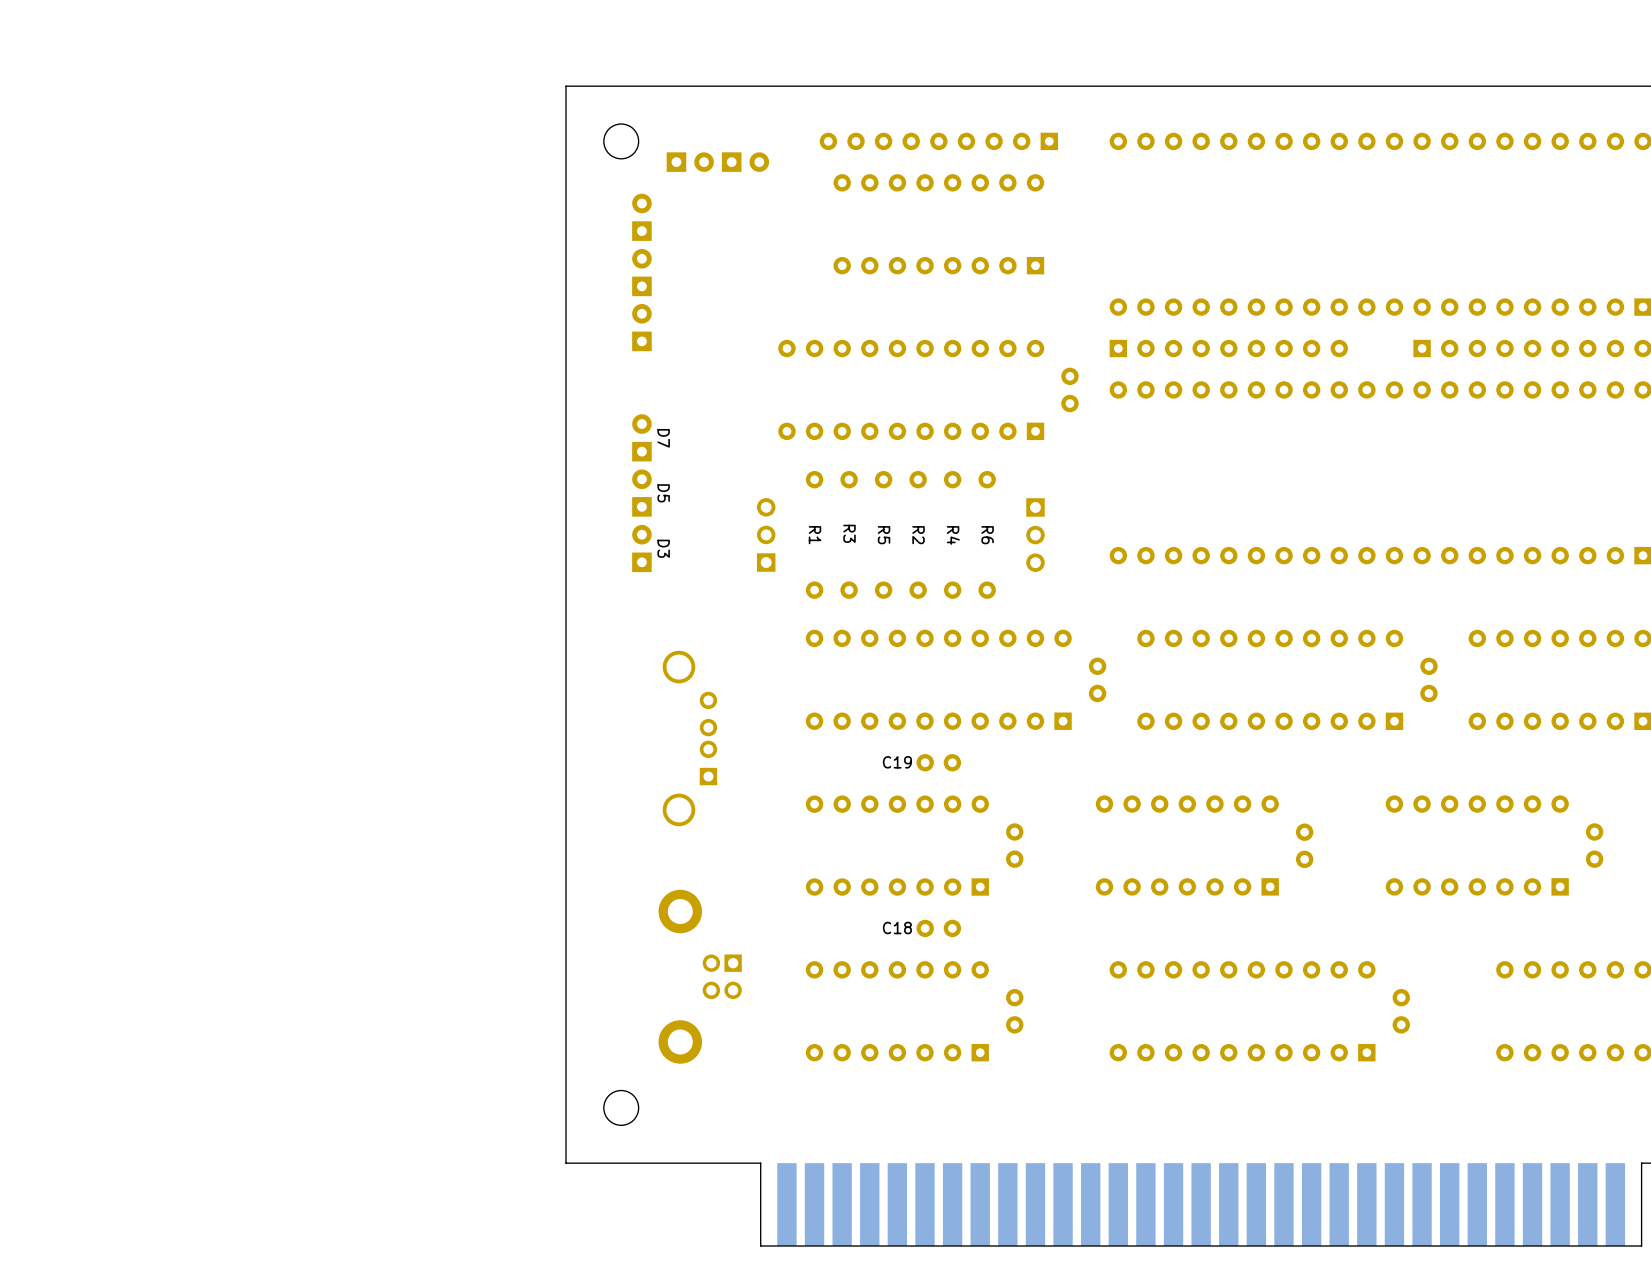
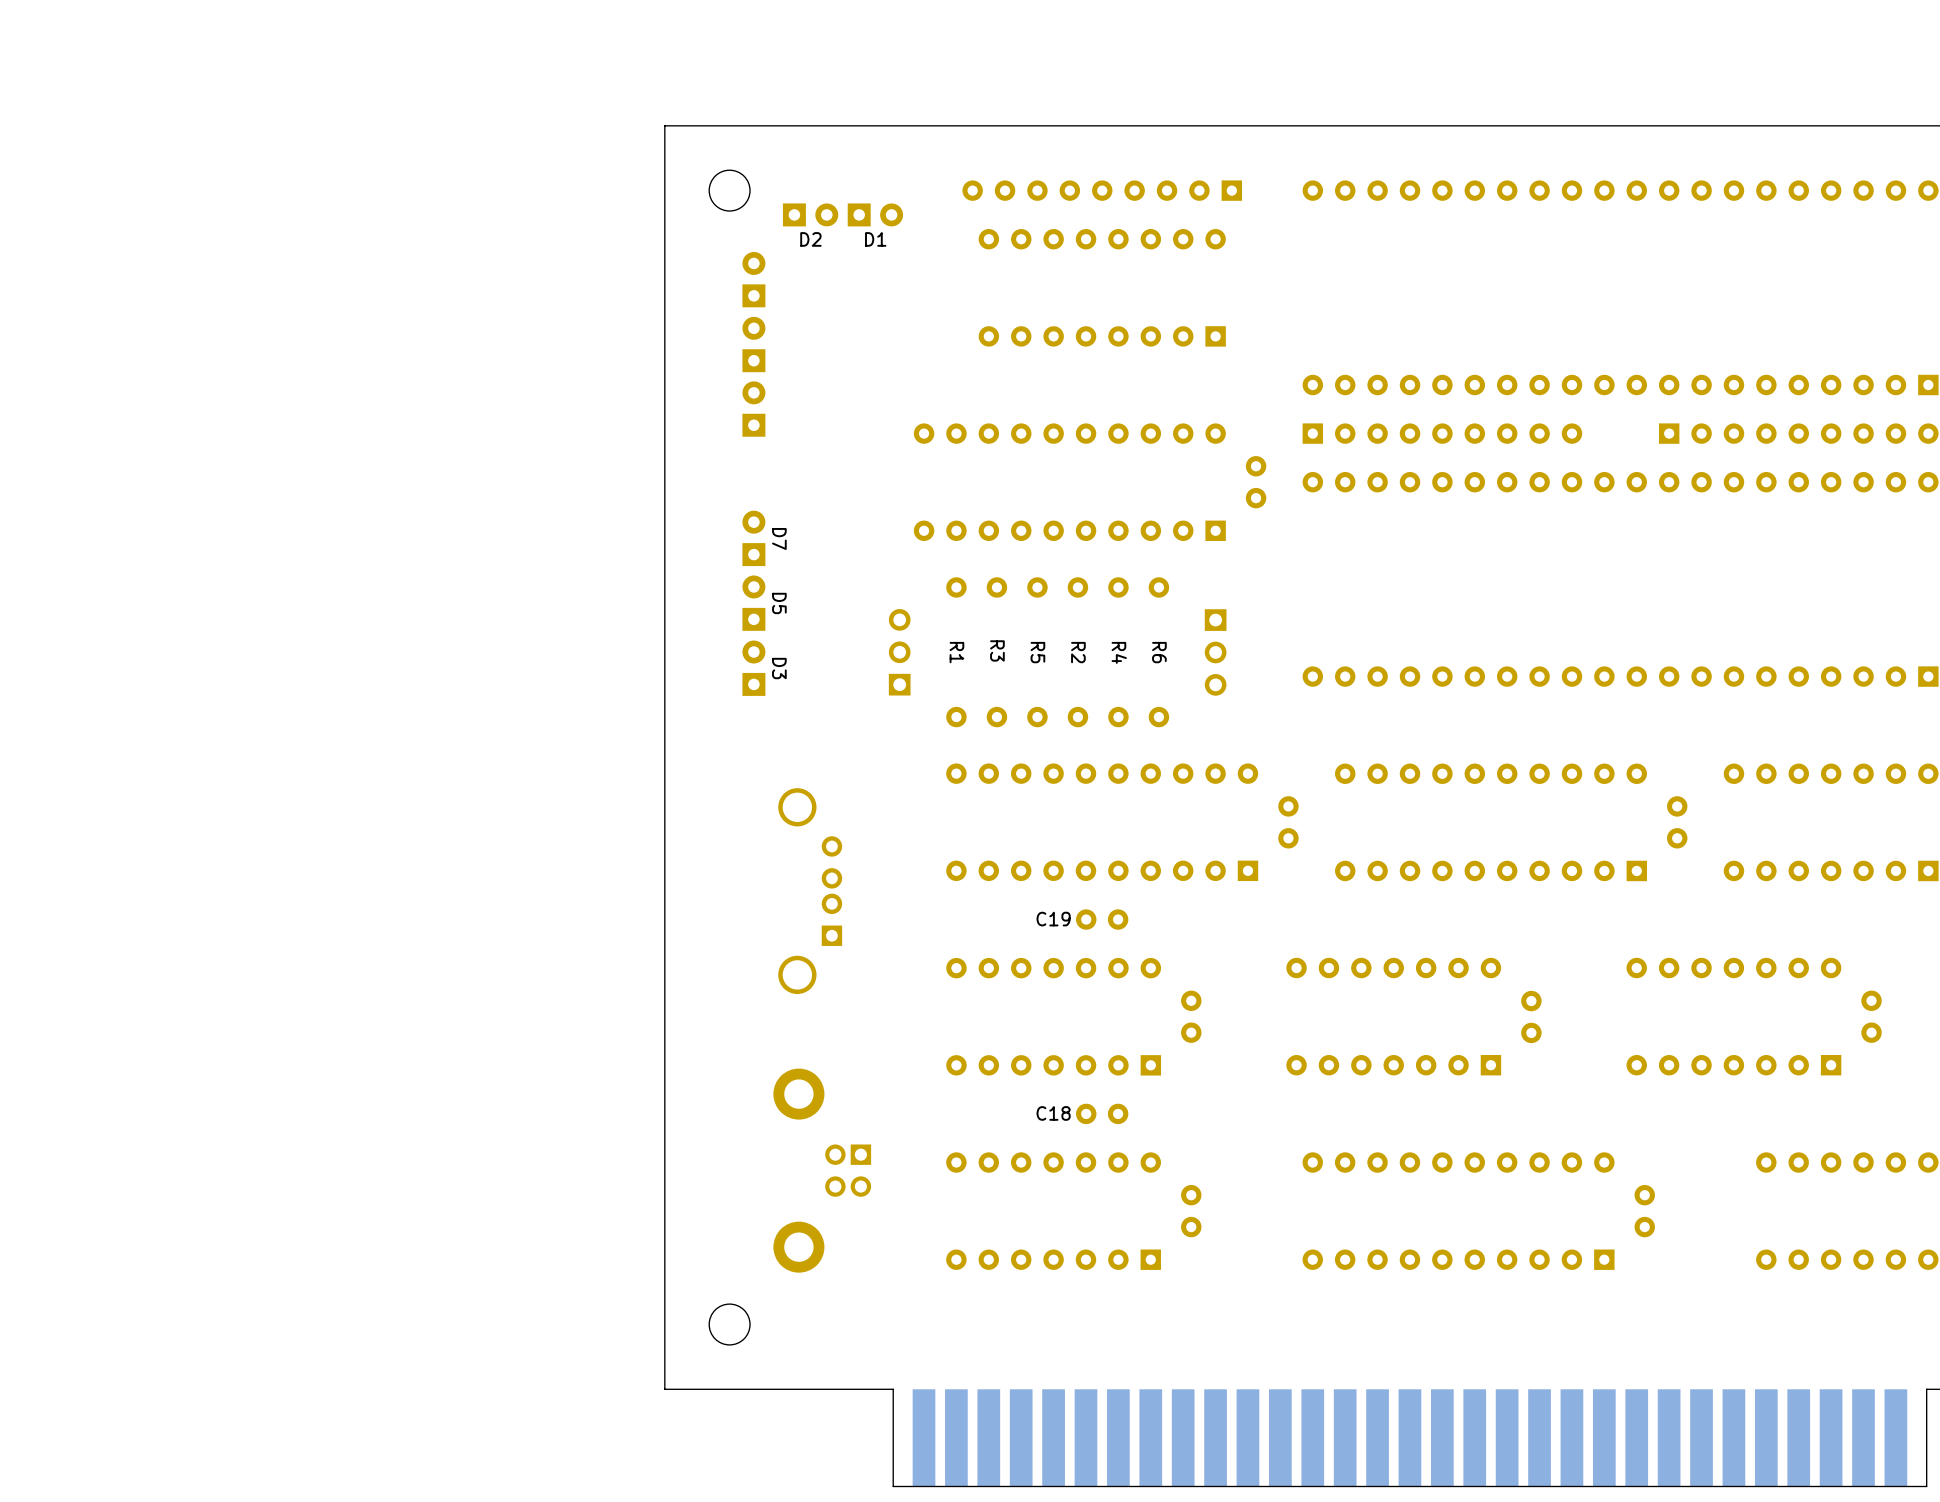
D2 name: none -> D2 (810, 239)
D1 name: none -> D1 (875, 239)

